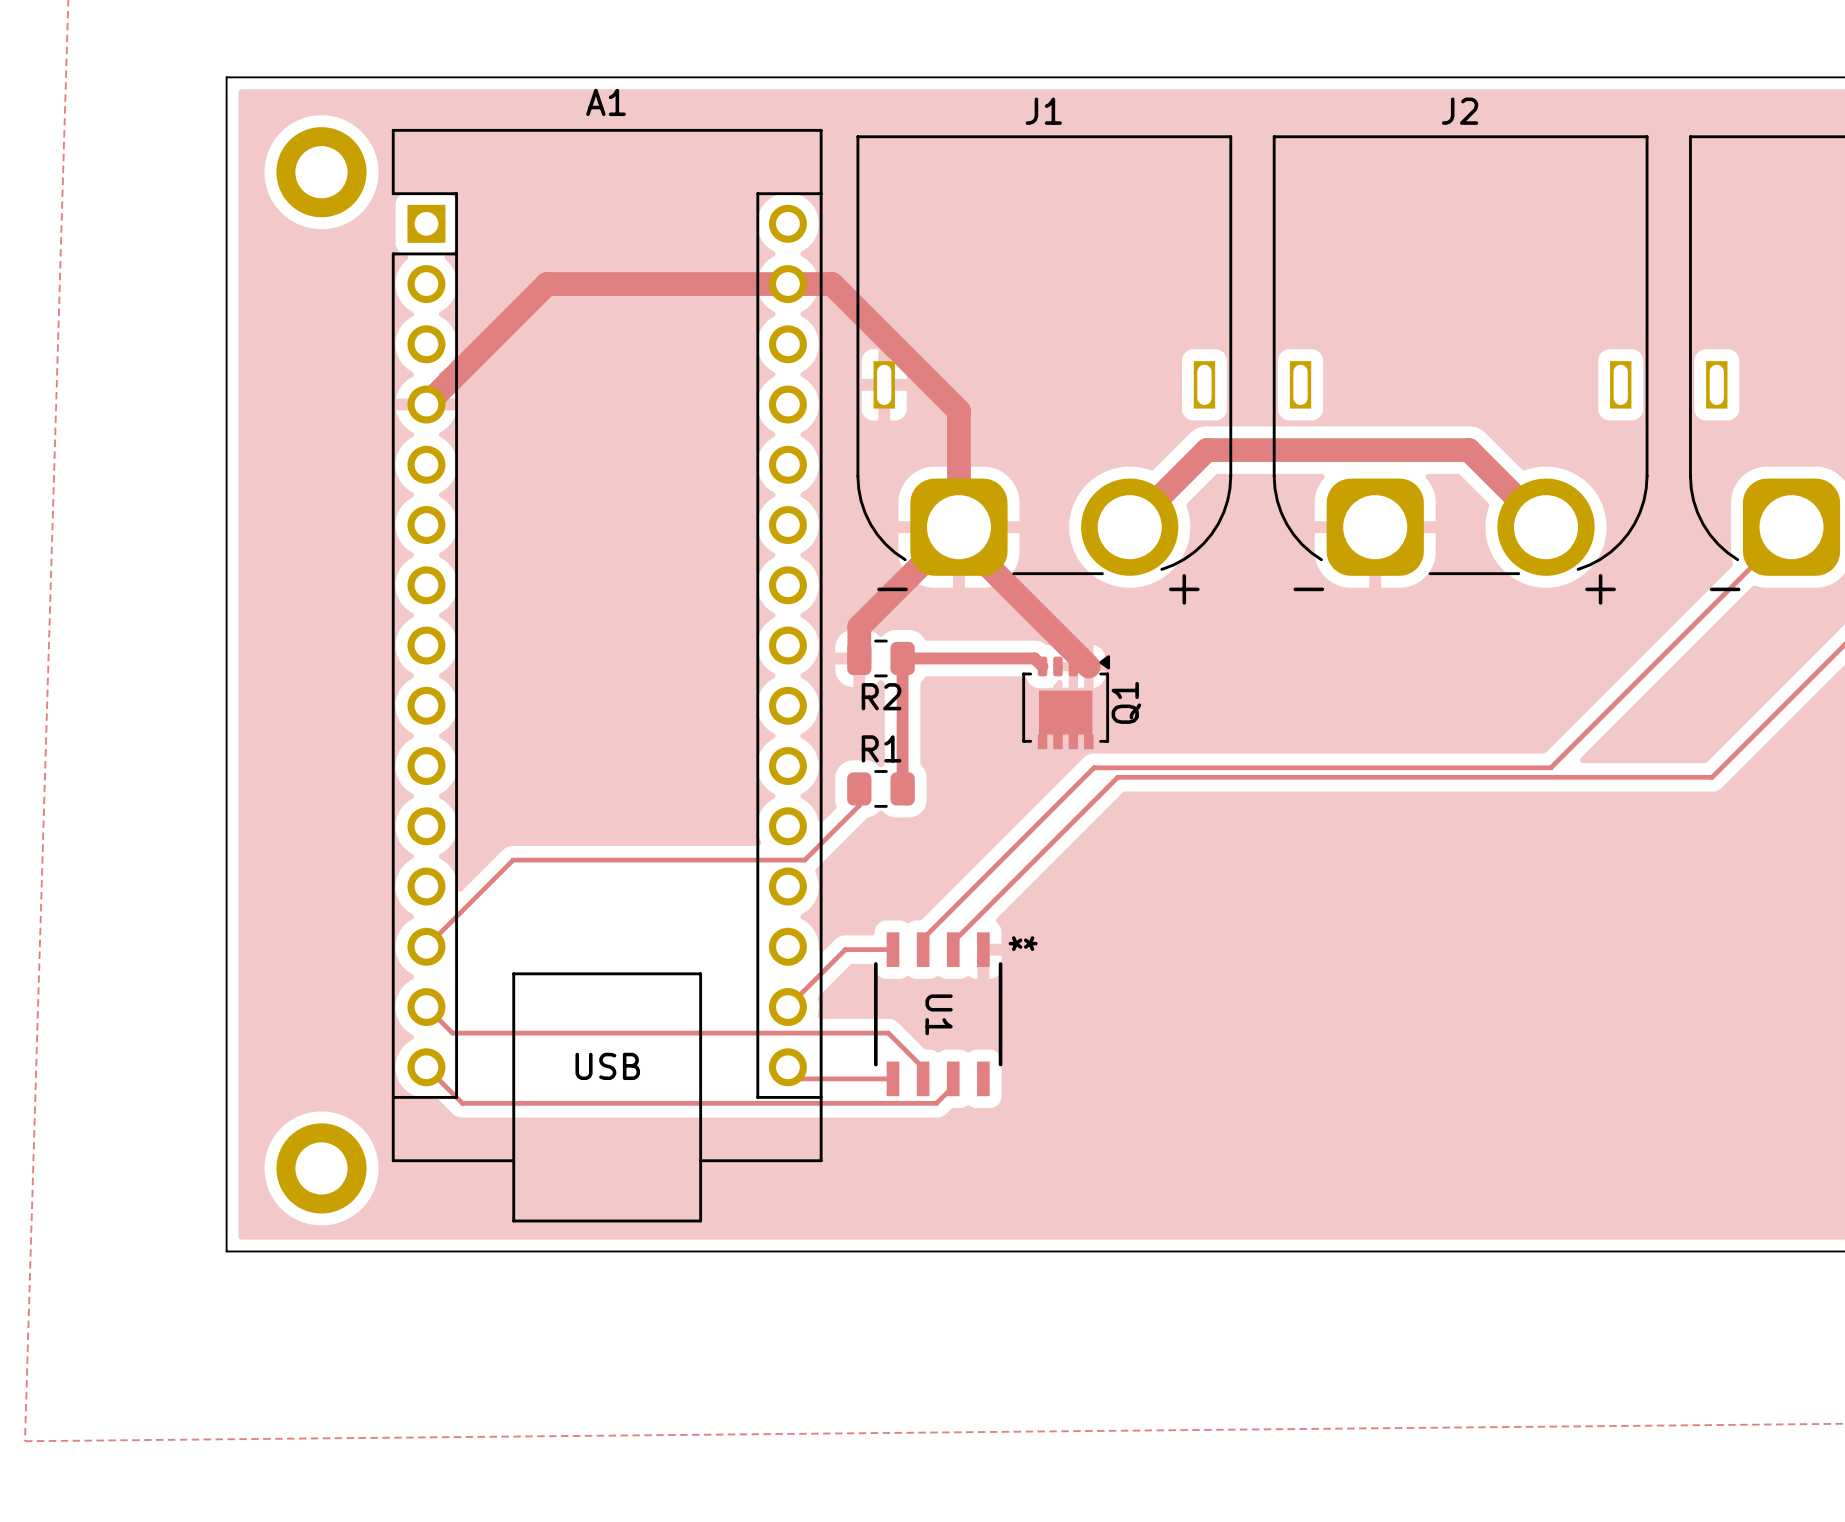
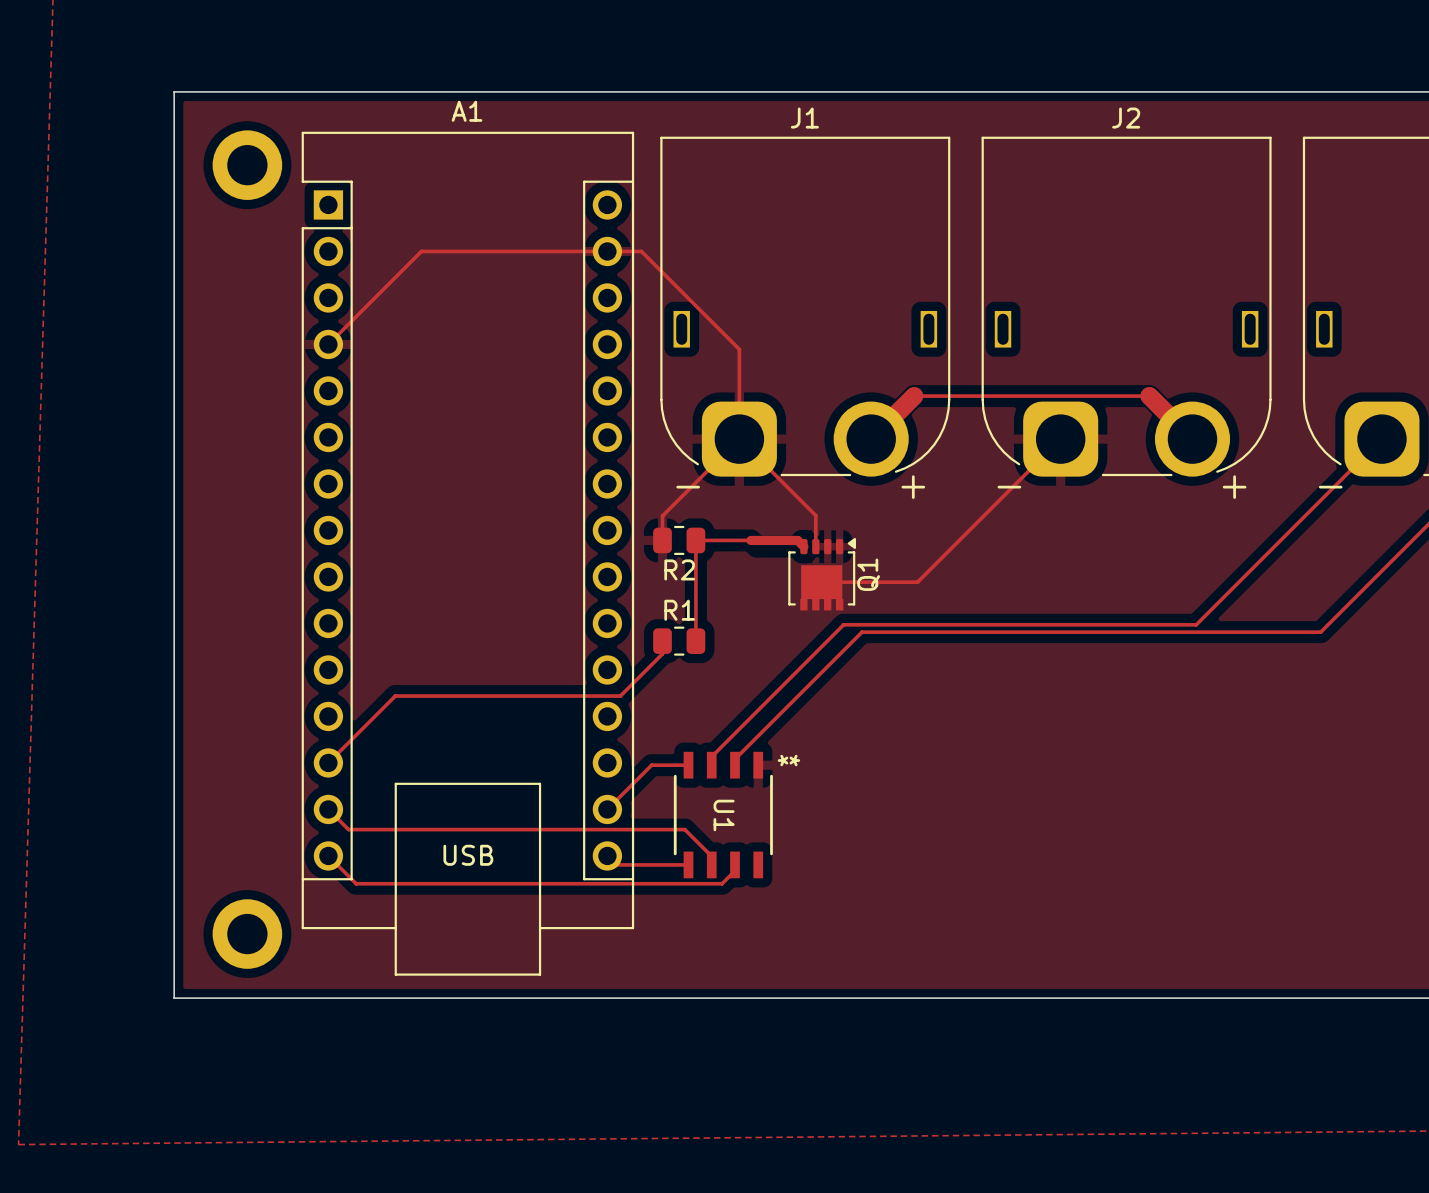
track width: thick (426, 404) (546, 284) (832, 284) (958, 410) (958, 527) (859, 626) (859, 658) -> thin (328, 344) (421, 251) (641, 251) (739, 349) (739, 439) (662, 516) (662, 540)
track: (1185, 471) (1206, 450) (1468, 450) (1490, 471) -> (914, 396) (1149, 396)
track: (958, 527) (958, 536) (1088, 666) -> (739, 439) (815, 515) (815, 546)
track: none -> (1060, 439) (917, 582) (821, 582)
track width: thick (973, 658) (902, 658) (902, 788) -> thin (750, 540) (695, 540) (695, 641)

